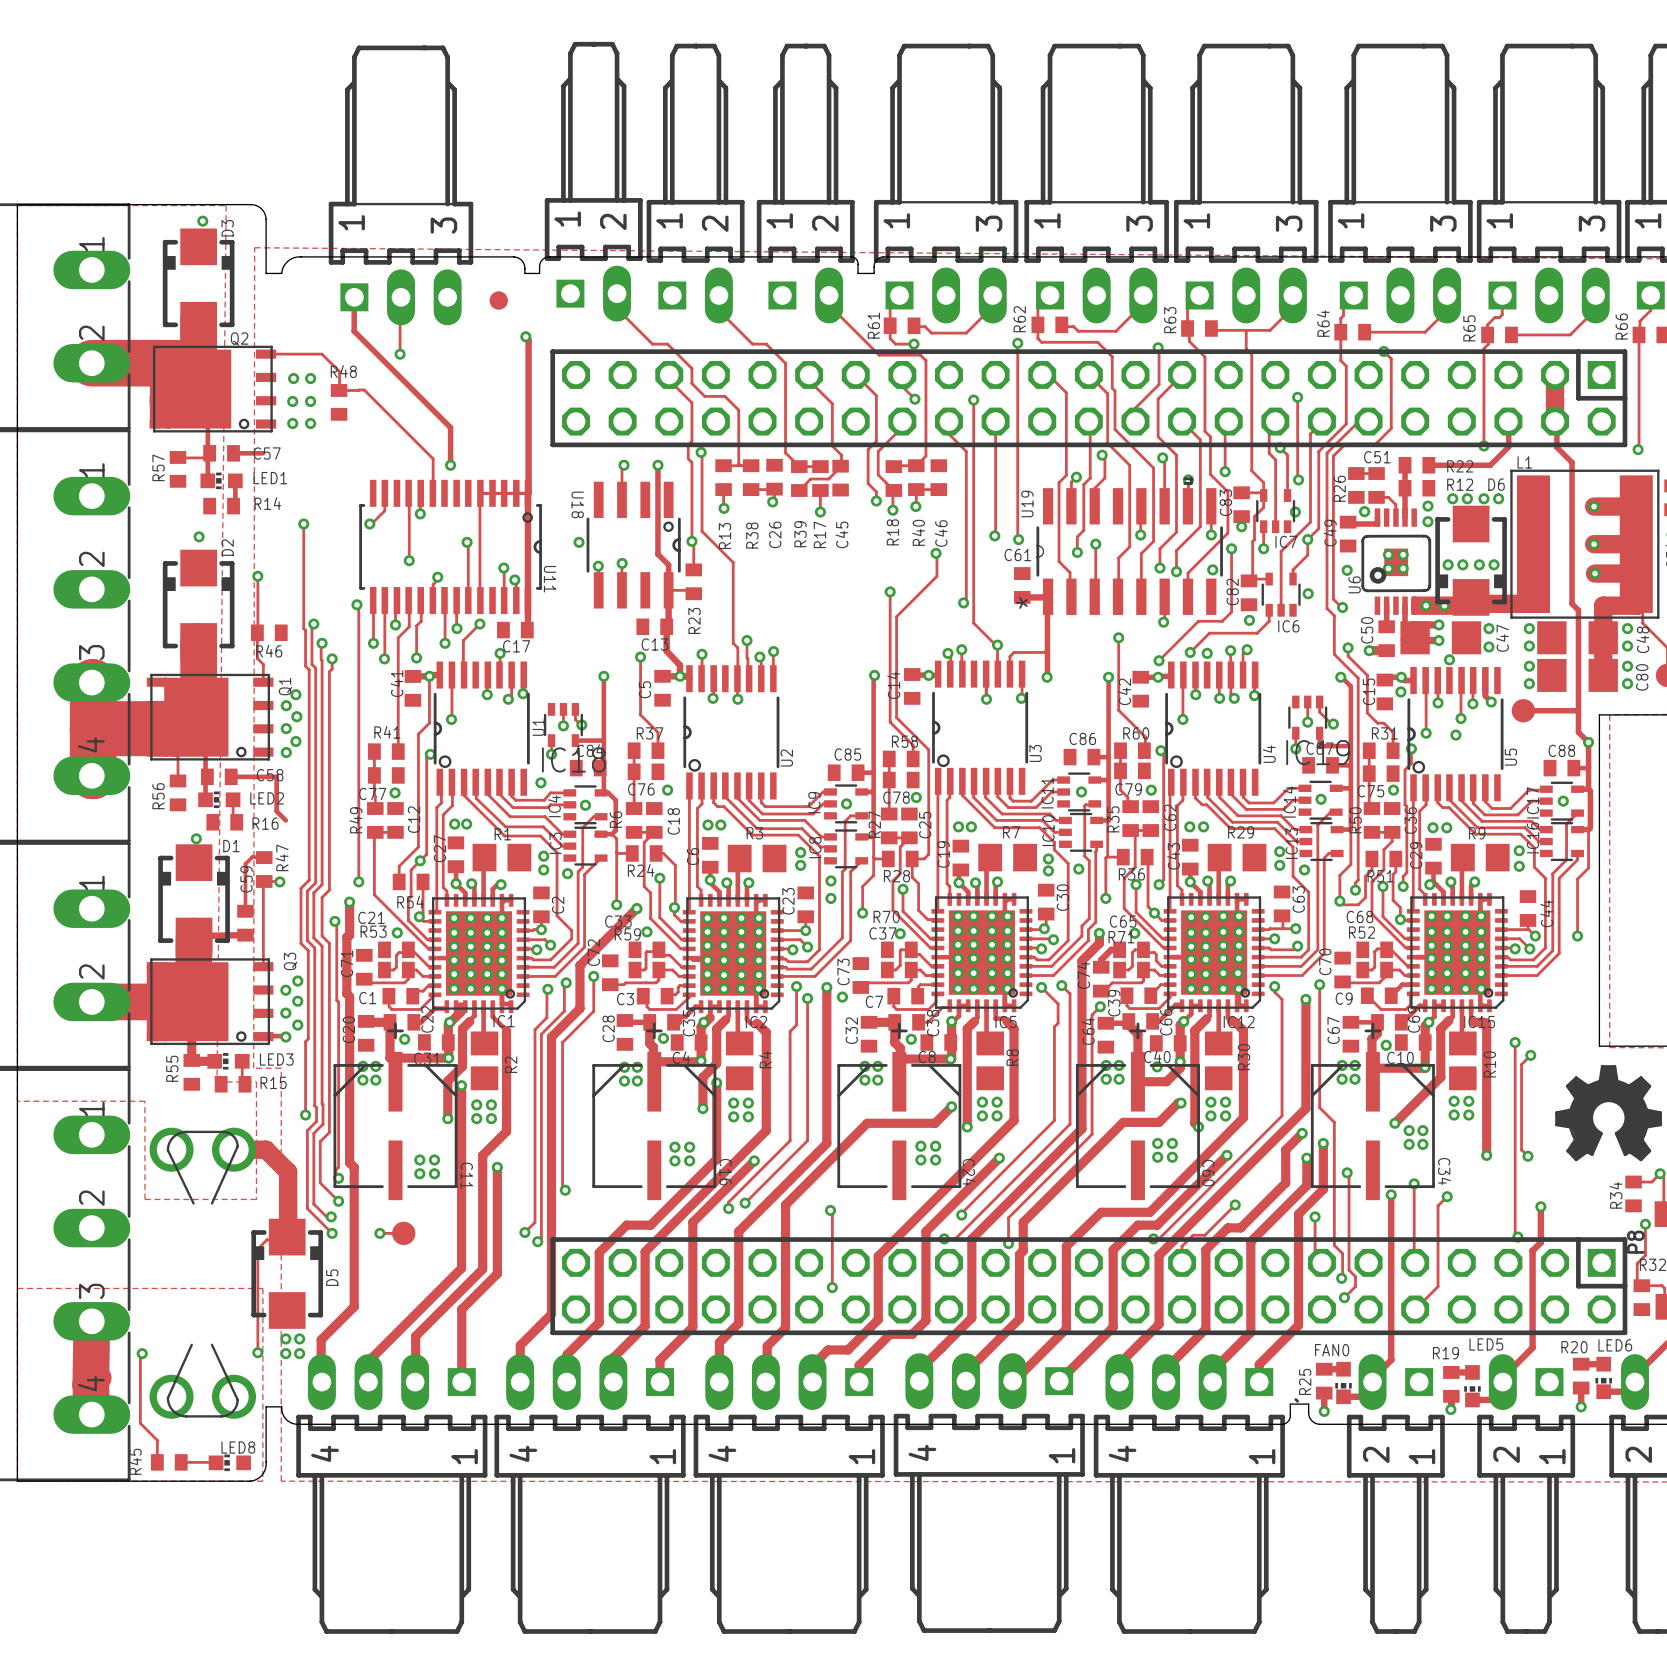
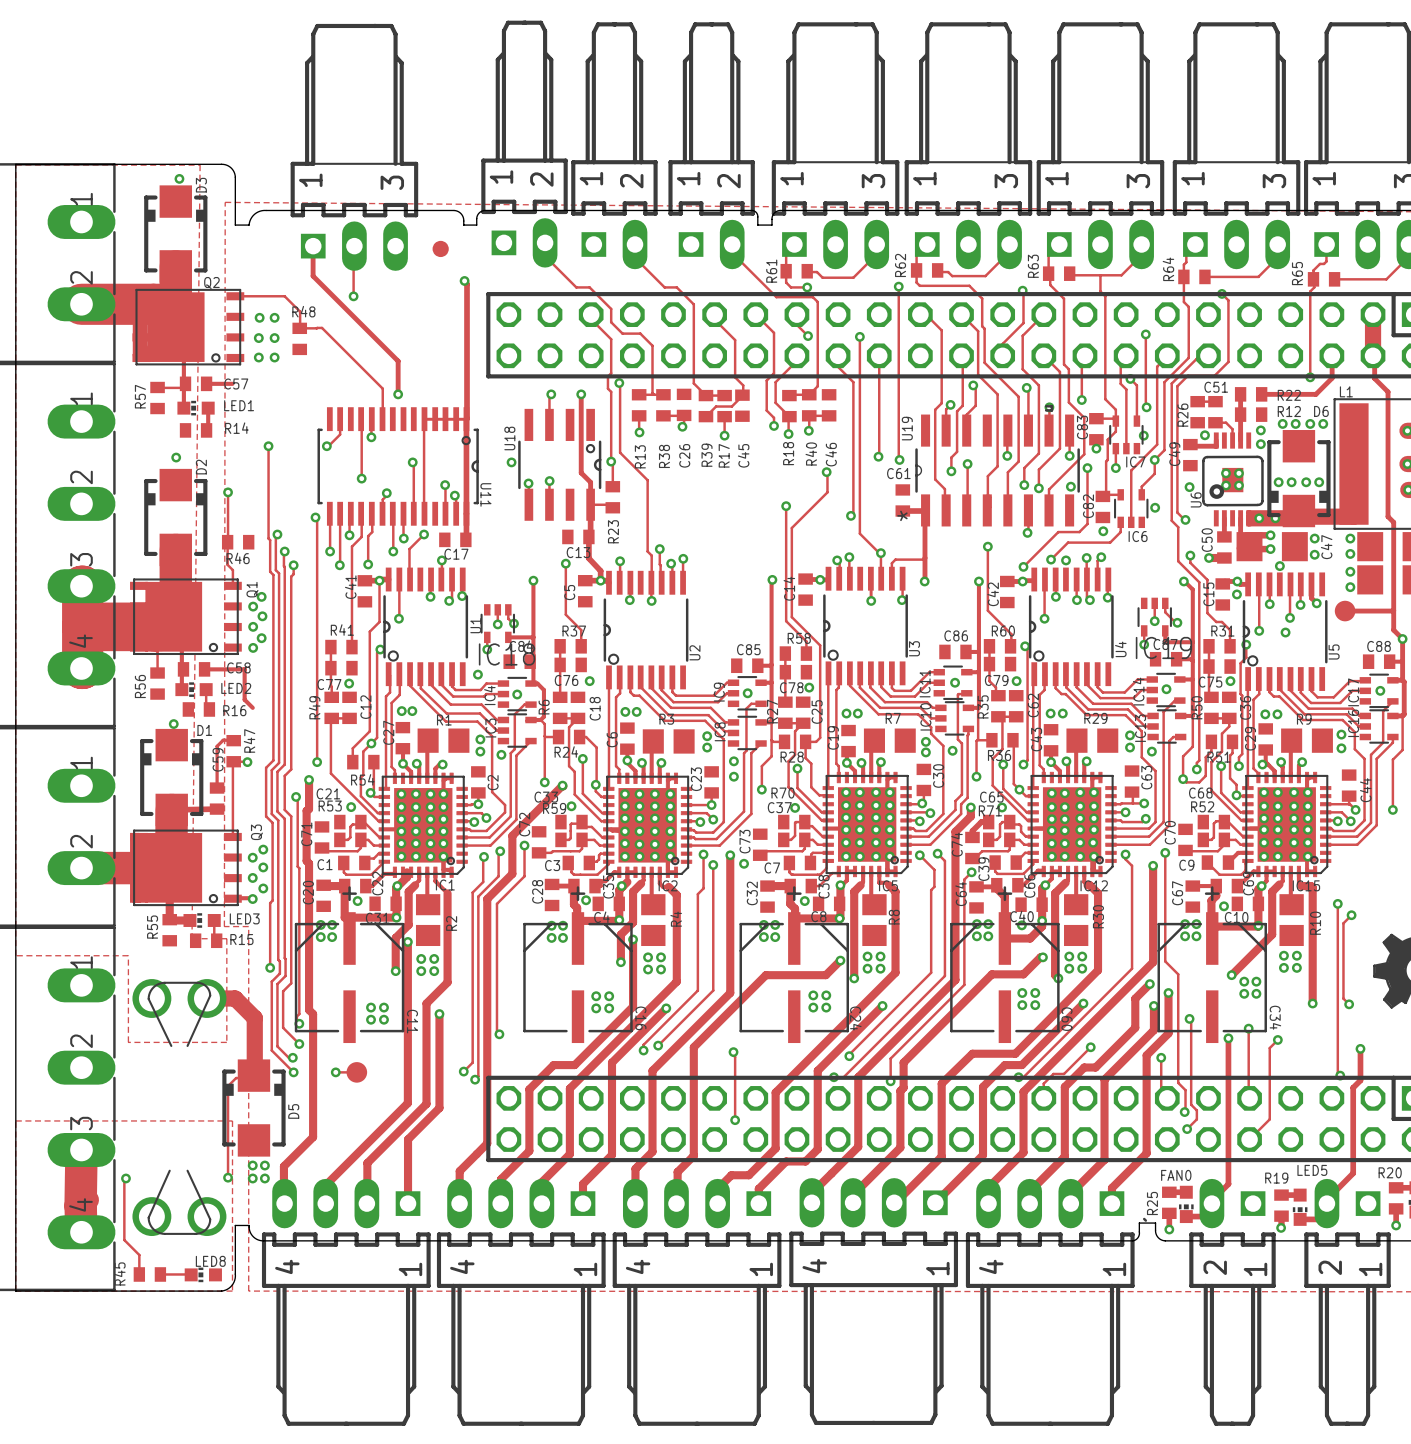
U18 name rotation: 0° (577, 504) -> 180° (509, 438)

